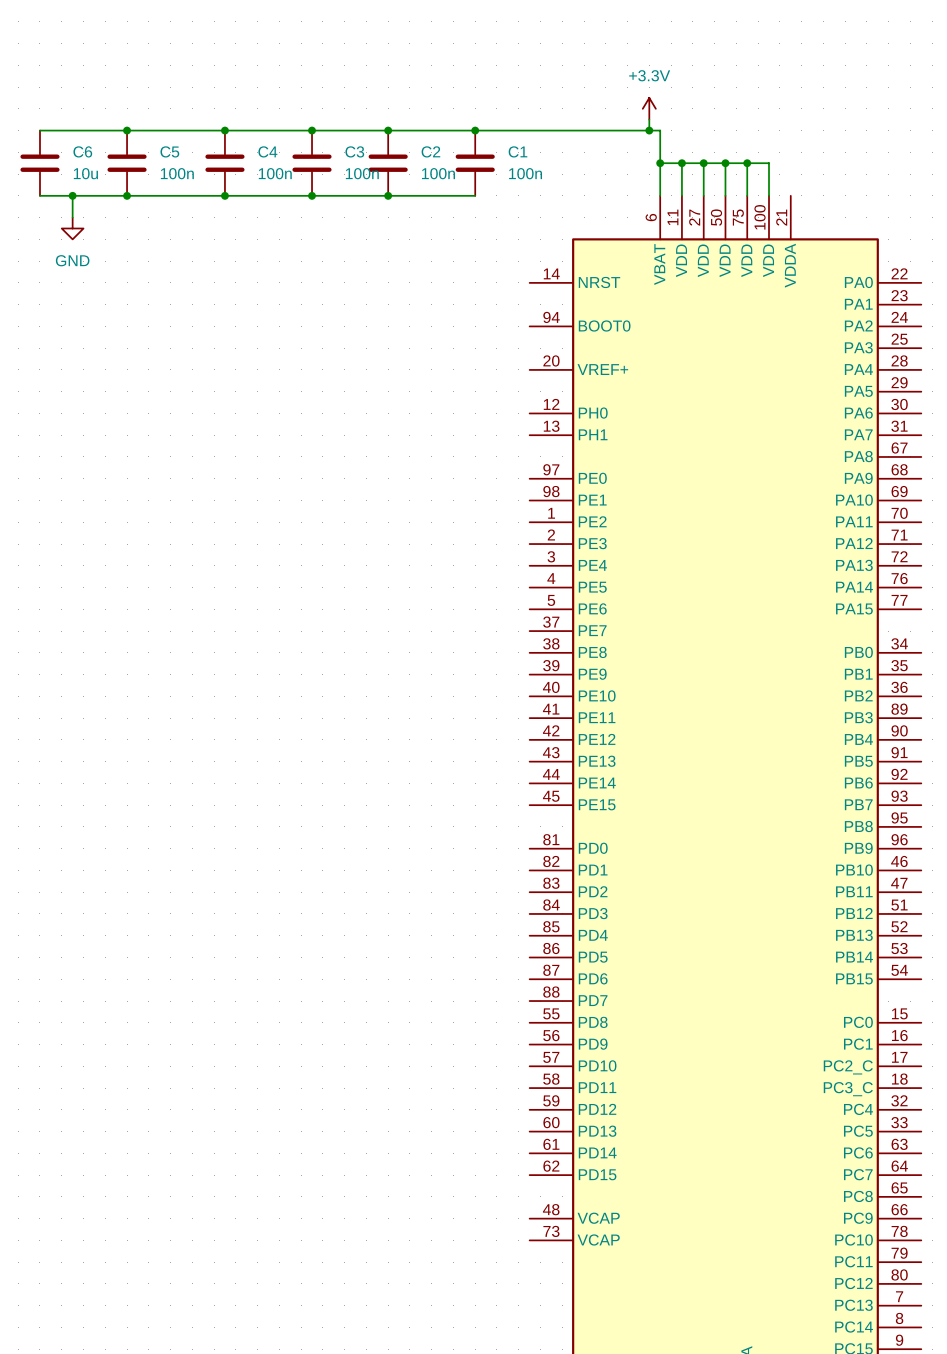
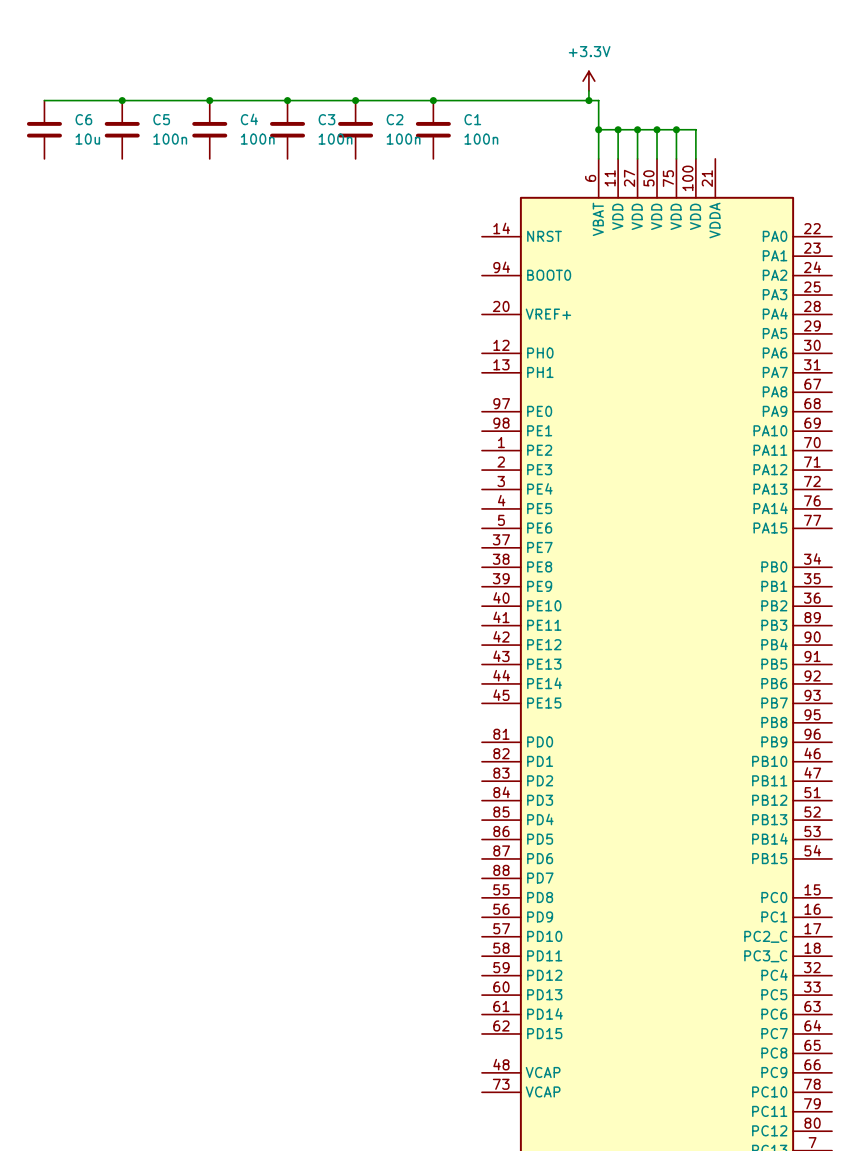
wire: (39, 195) (475, 195) -> none
wire: (72, 195) (72, 217) -> none
junction: (72, 195) -> none
junction: (127, 195) -> none
junction: (224, 195) -> none
junction: (312, 195) -> none
junction: (388, 195) -> none
power symbol: GND (72, 228) -> none

